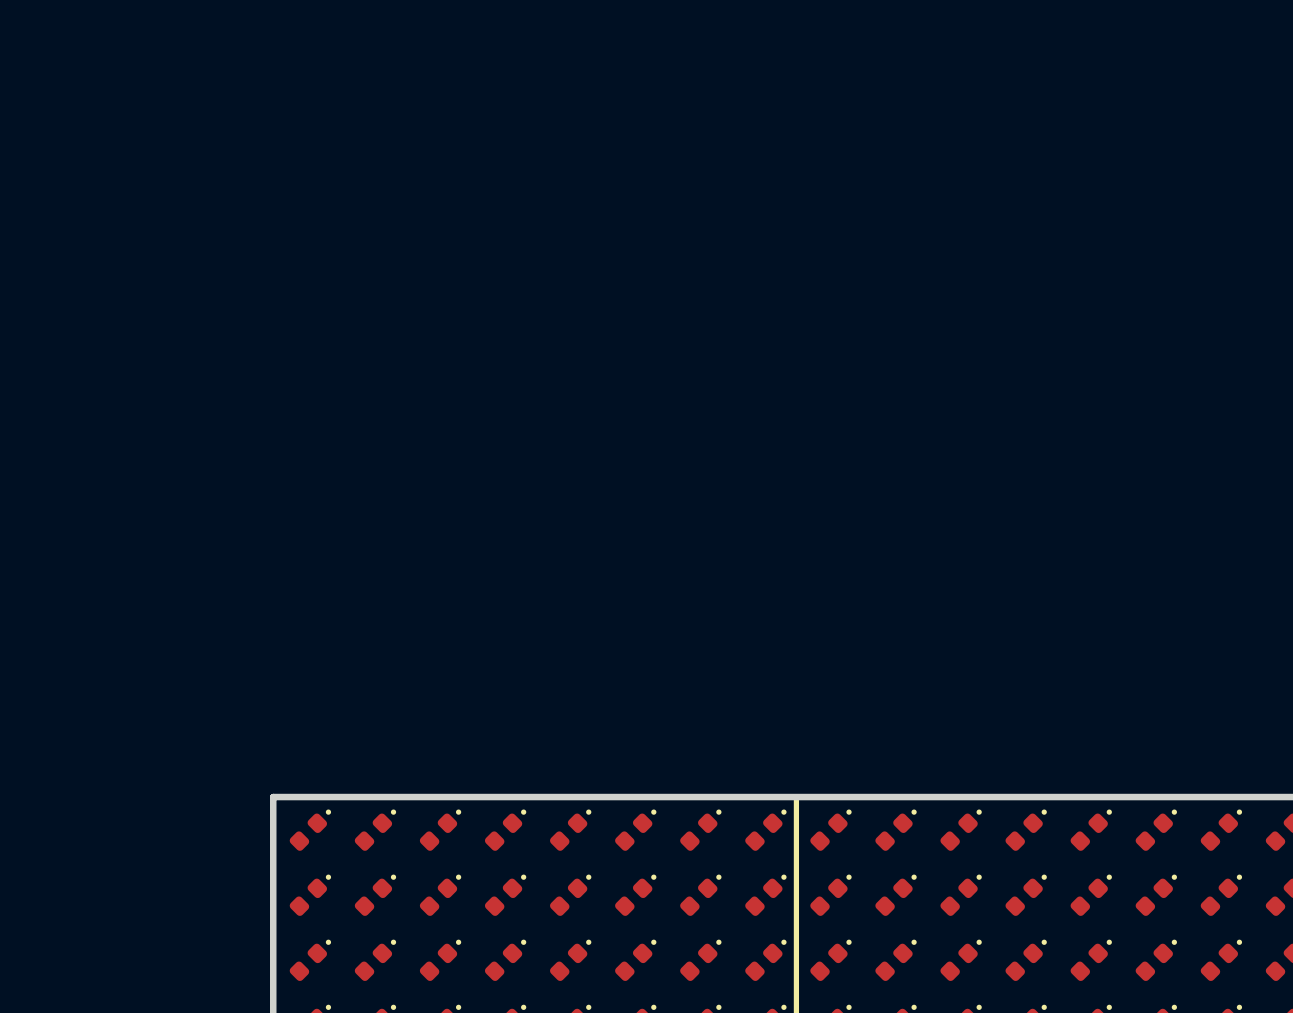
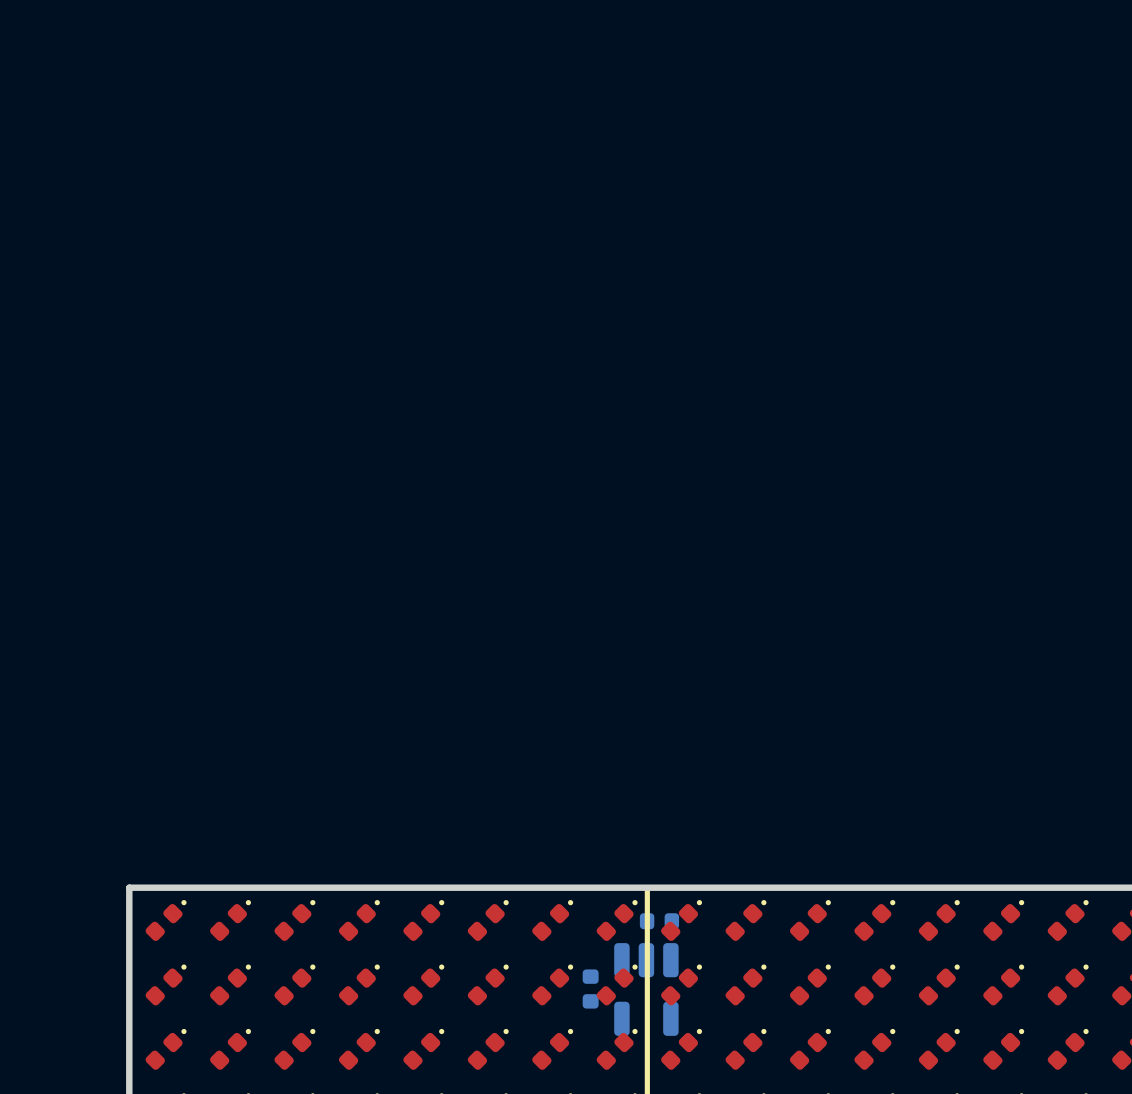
part: none -> (659, 921)
part: none -> (590, 989)
part: none -> (646, 989)

